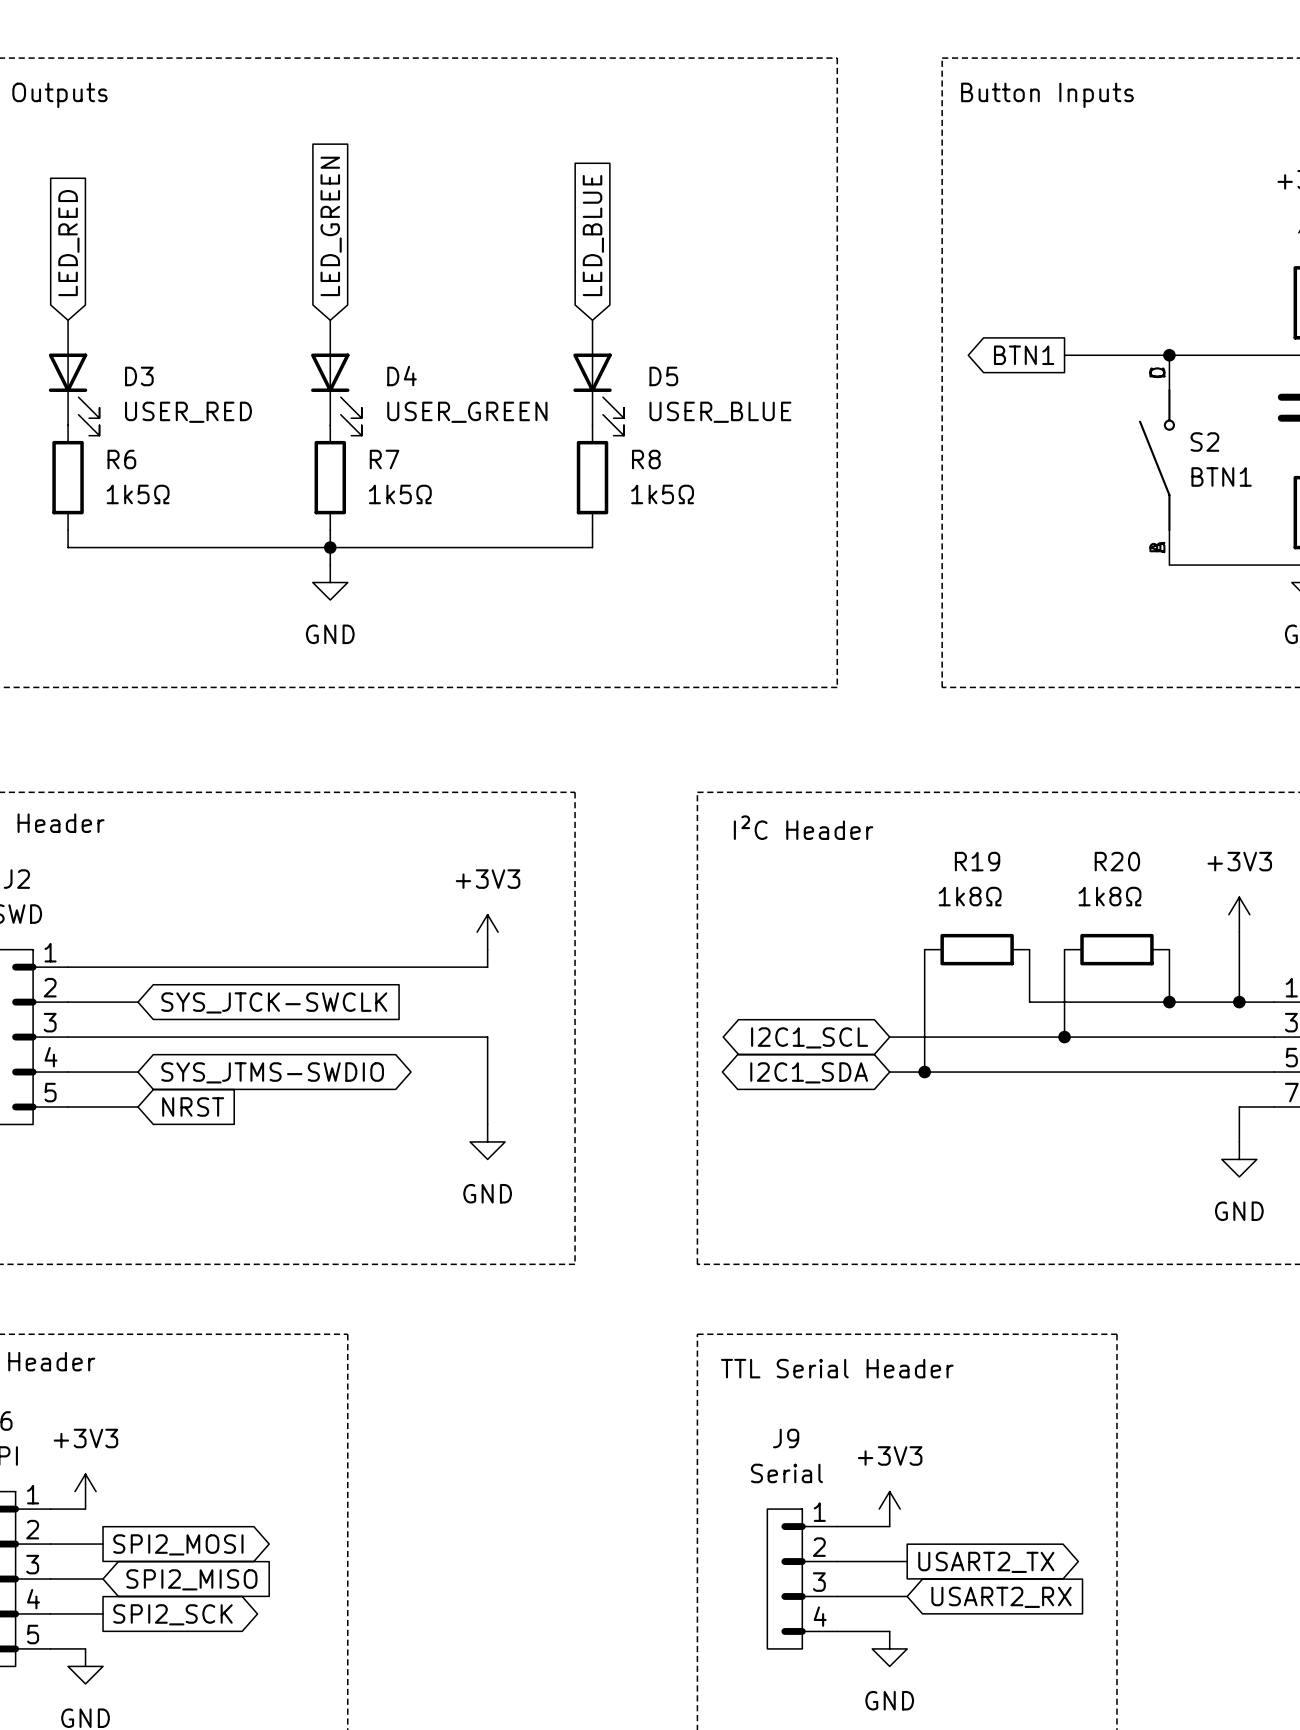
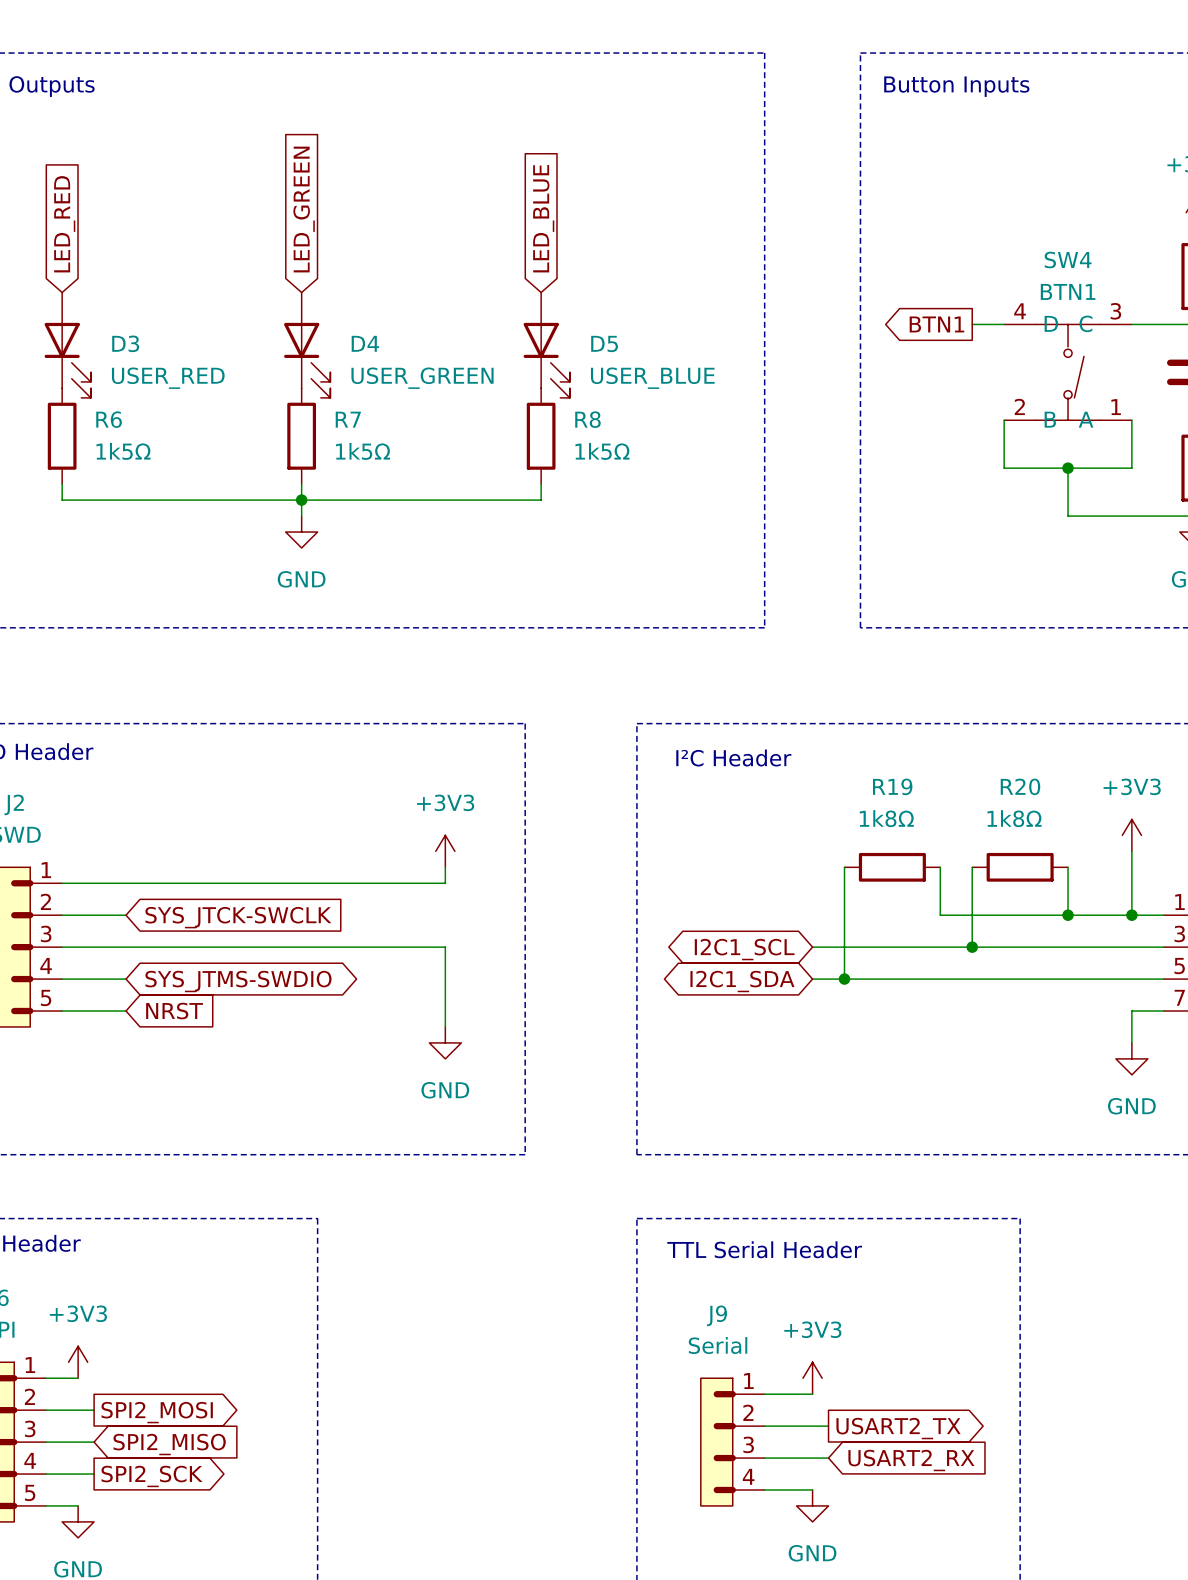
junction: (1169, 355) -> none
SW4: none -> BTN1 (1068, 372)
wire: none -> (1004, 420) (1004, 468) (1131, 468) (1131, 420)
S2: BTN1 (1157, 460) -> none
junction: none -> (1068, 468)

